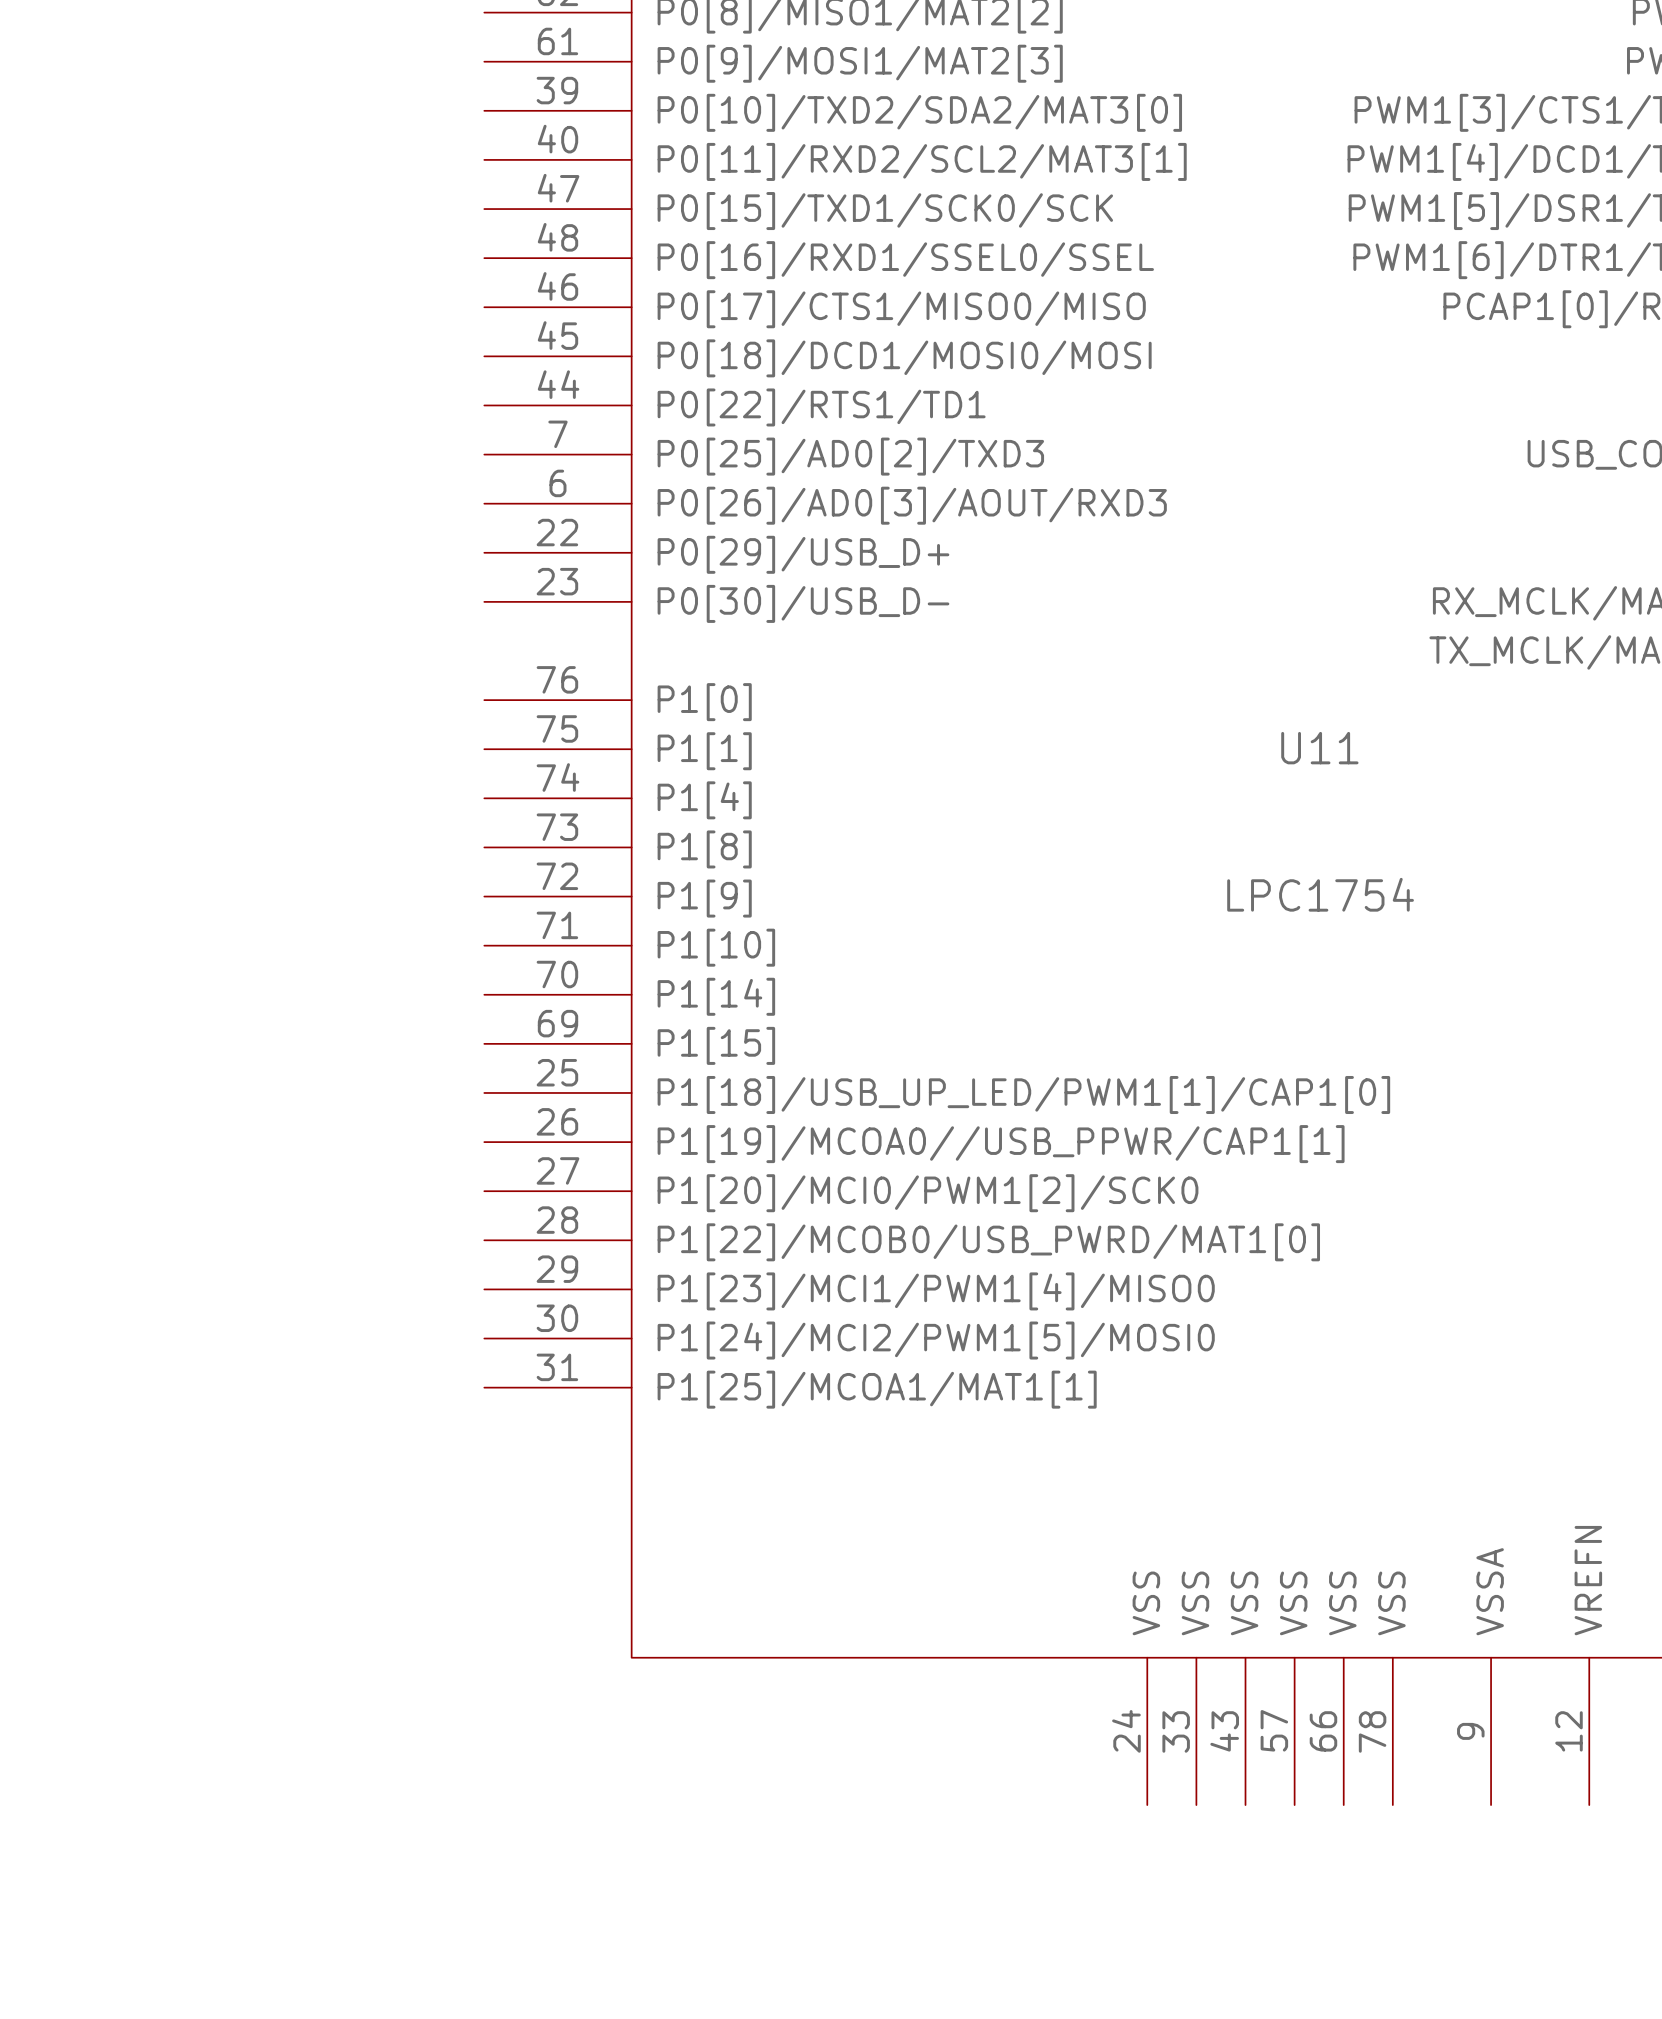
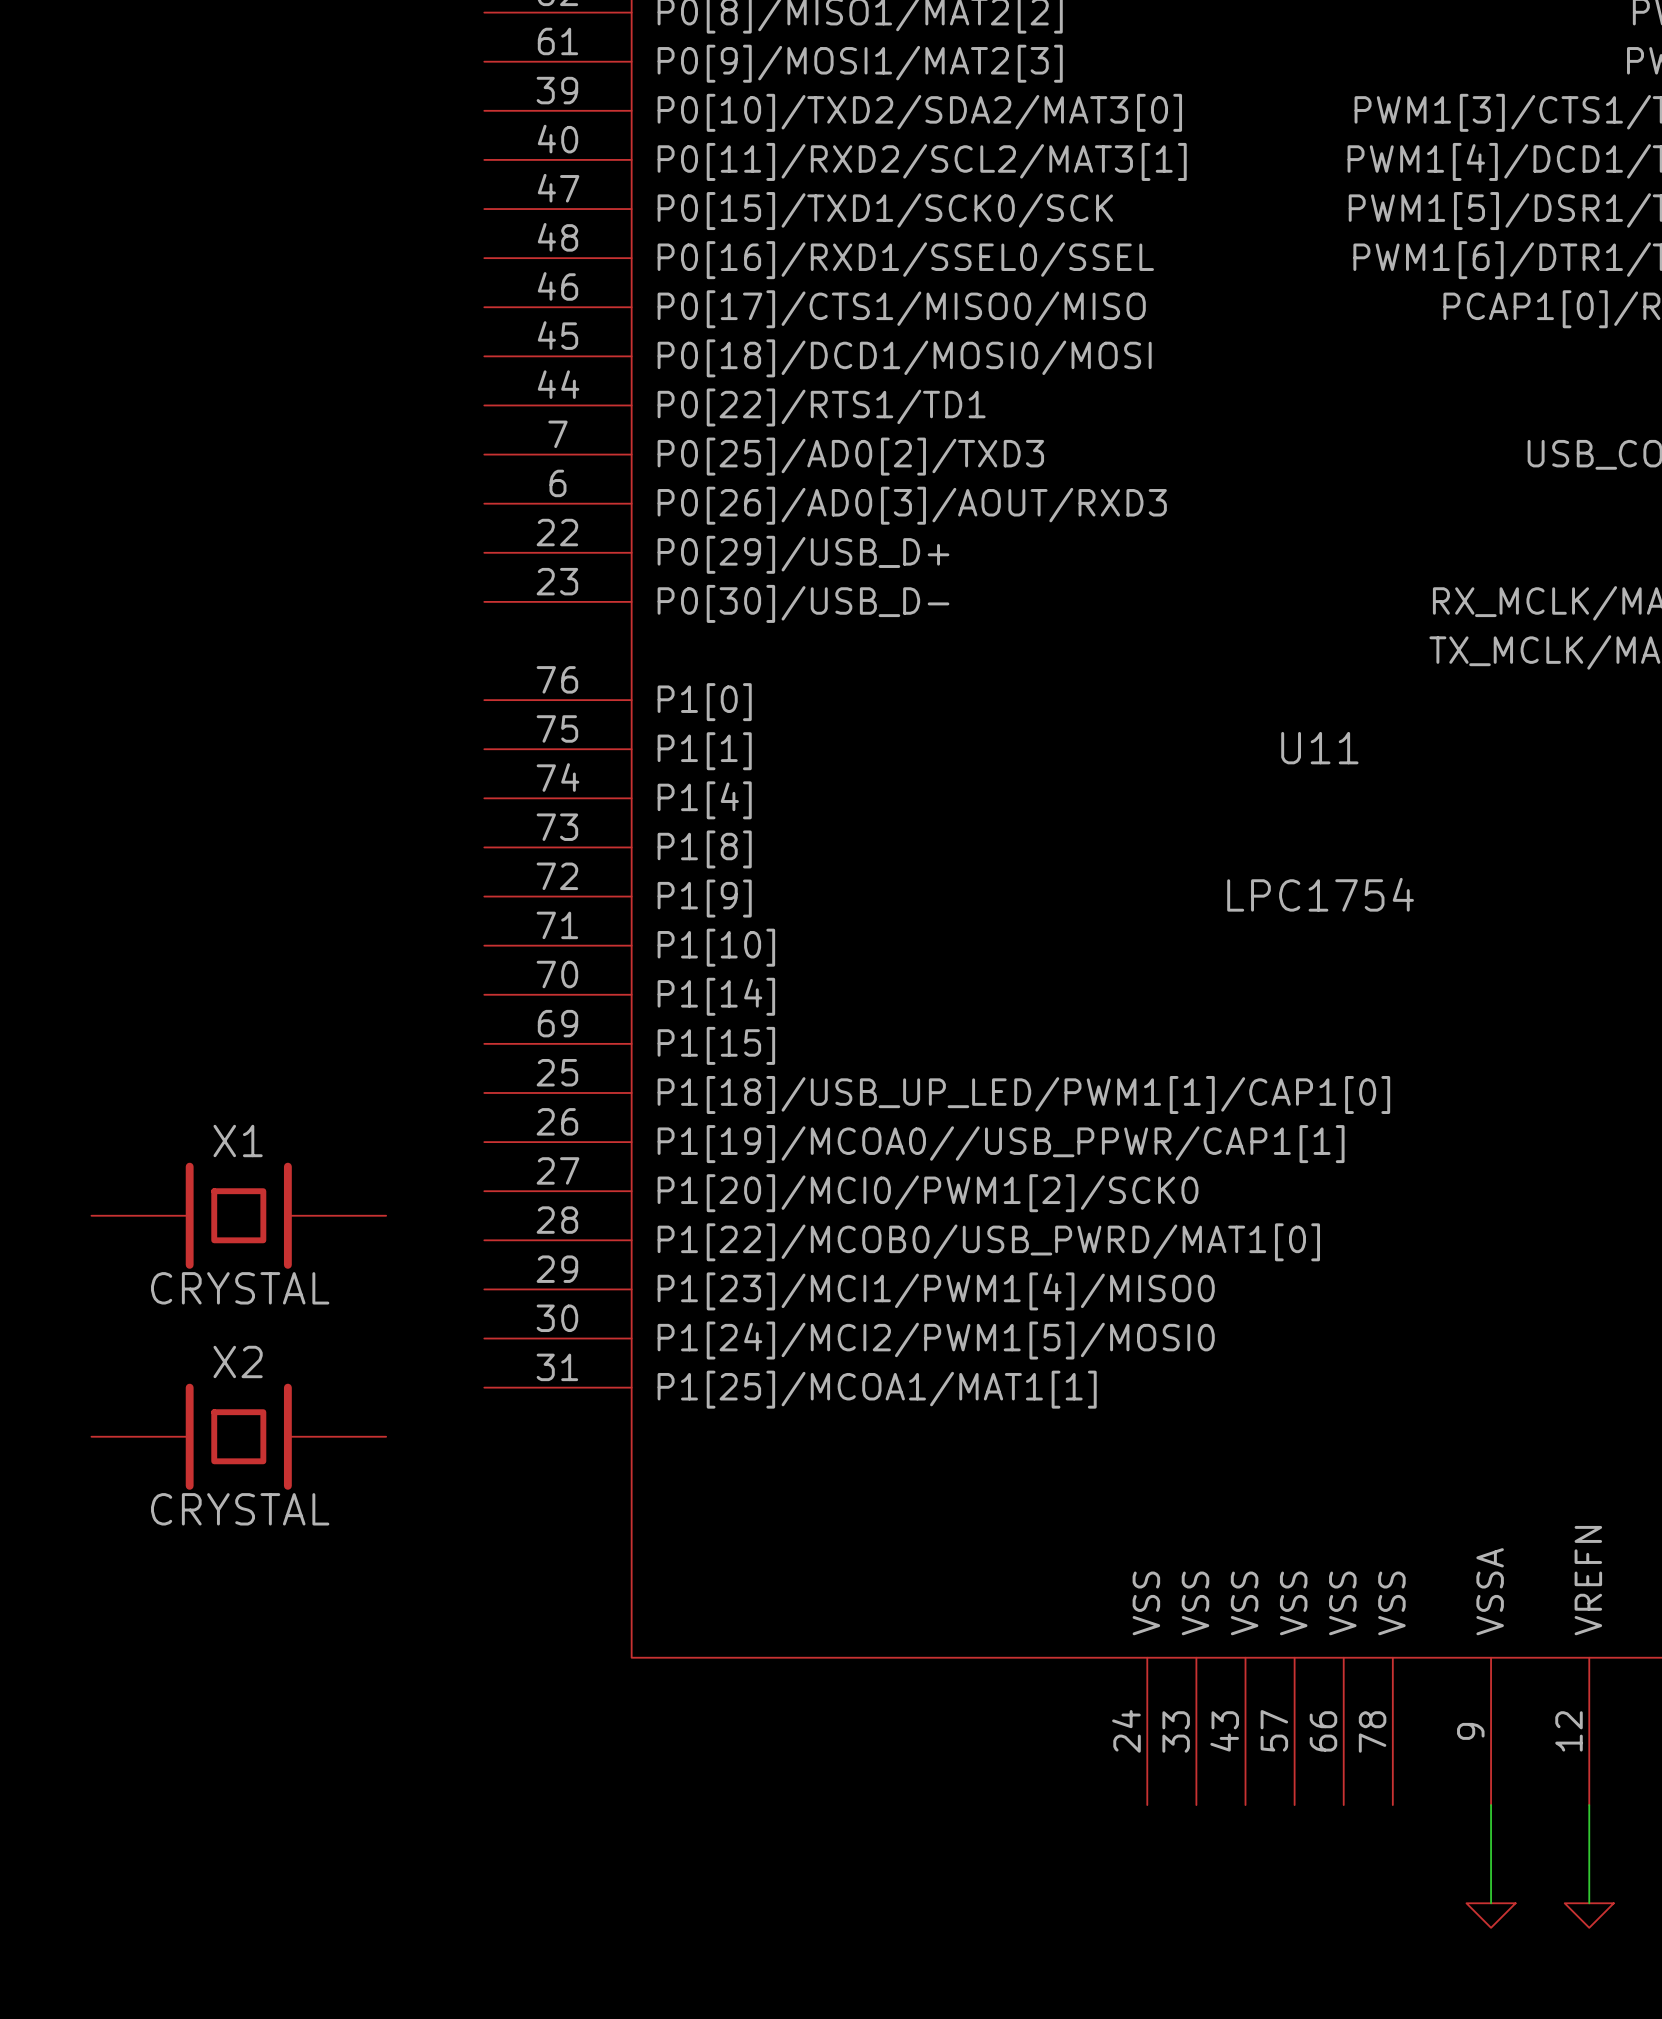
X1: none -> CRYSTAL (238, 1215)
X2: none -> CRYSTAL (238, 1436)
wire: none -> (1491, 1805) (1491, 1903)
wire: none -> (1589, 1805) (1589, 1903)
power symbol: none -> (1491, 1915)
power symbol: none -> (1589, 1915)

